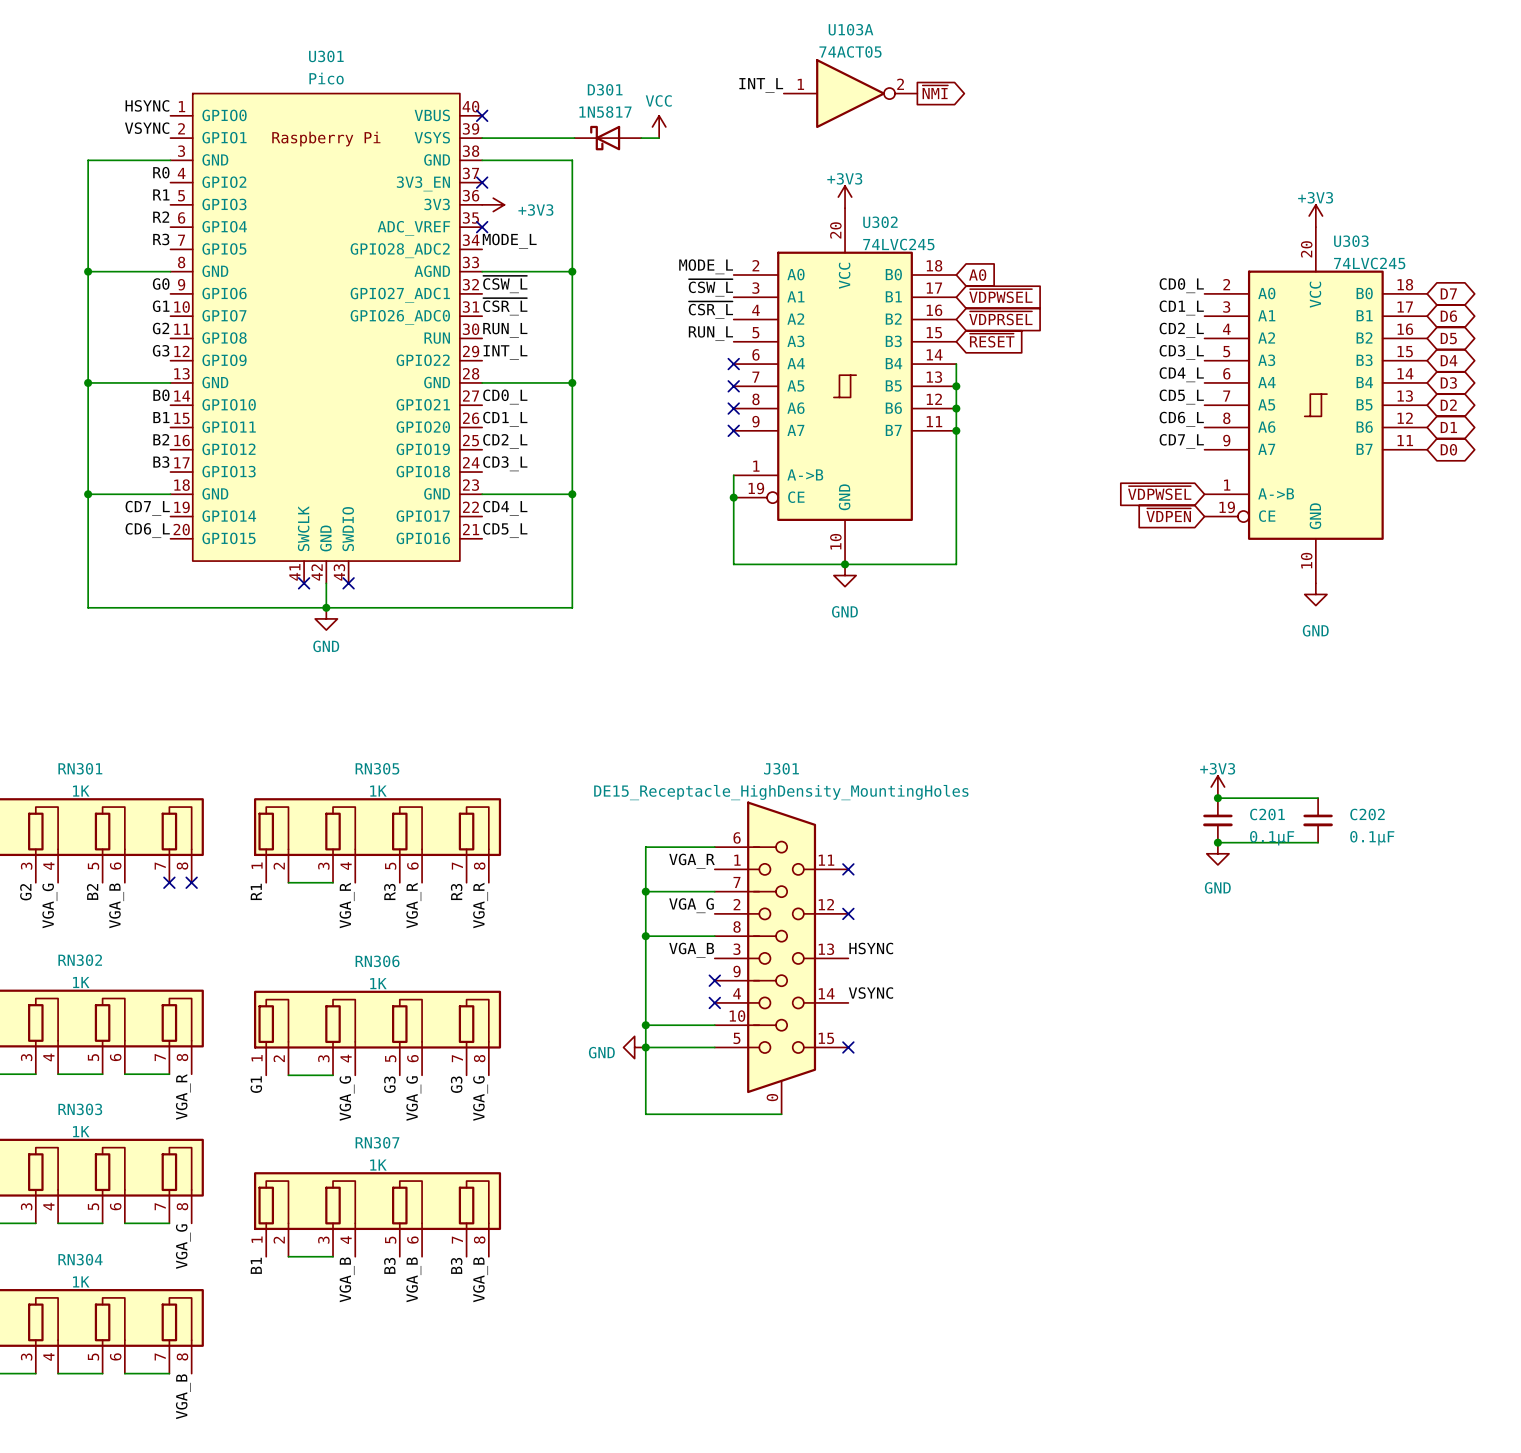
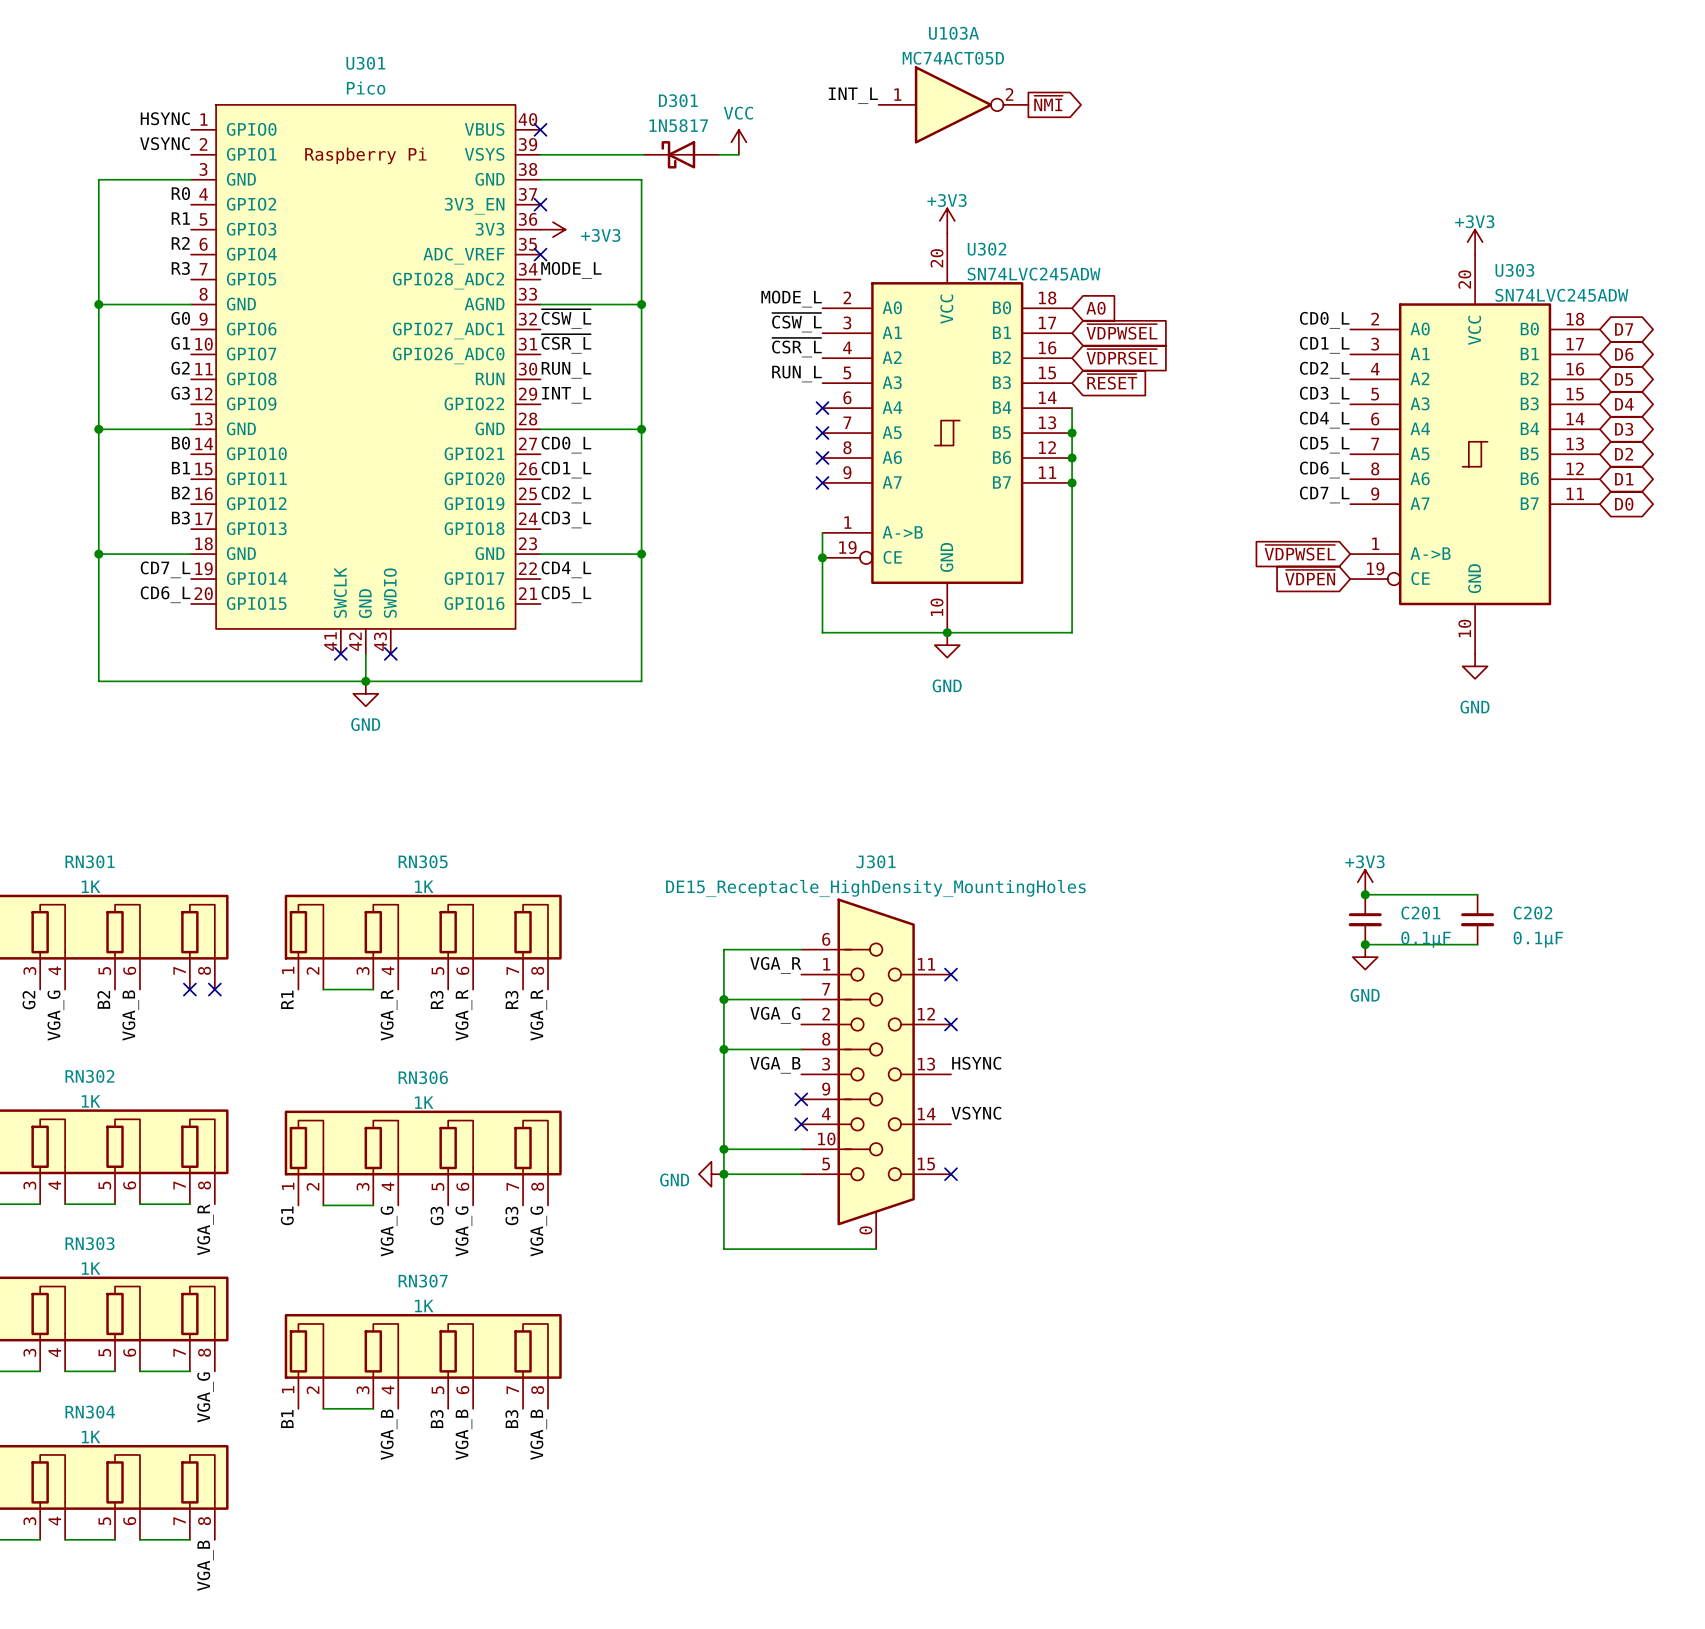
U103A value: 74ACT05 (850, 51) -> MC74ACT05D (953, 58)
U302 value: 74LVC245 (898, 244) -> SN74LVC245ADW (1034, 274)
U303 value: 74LVC245 (1369, 263) -> SN74LVC245ADW (1561, 295)

